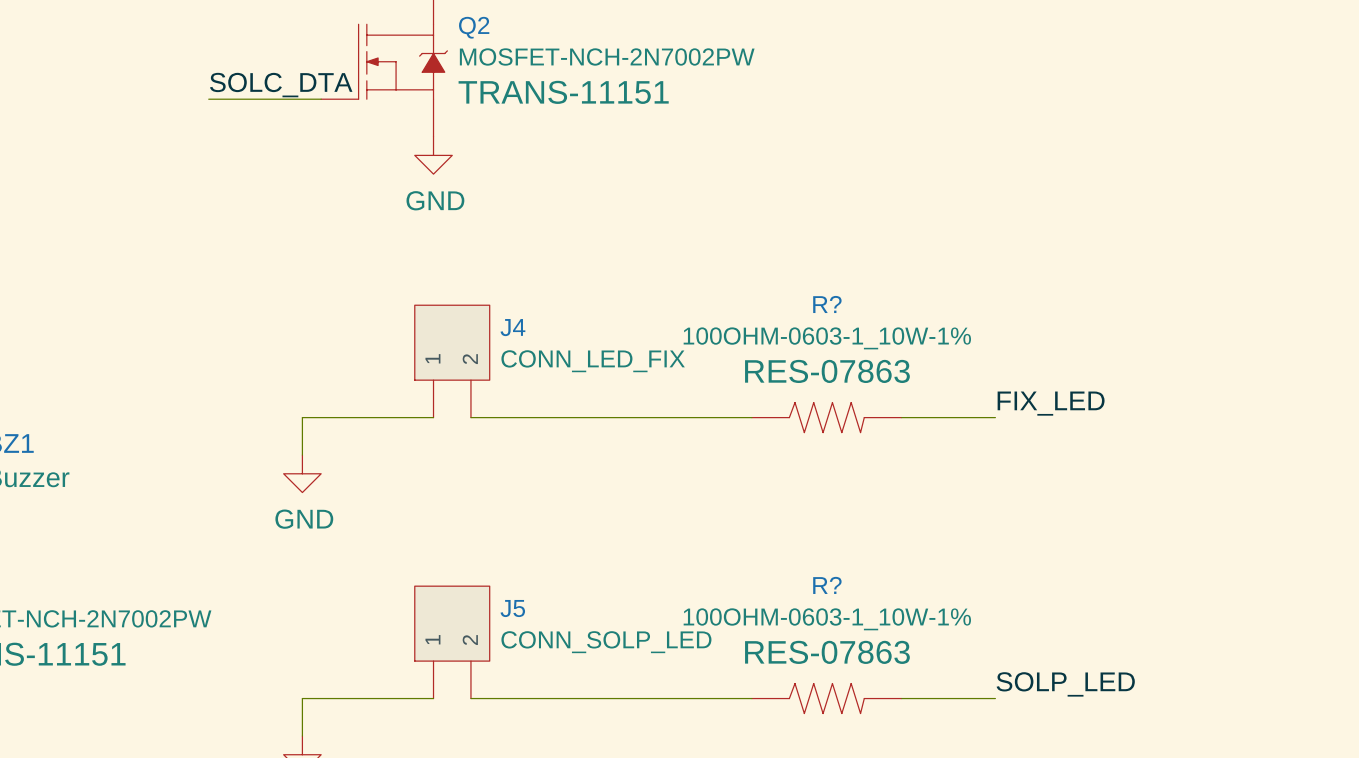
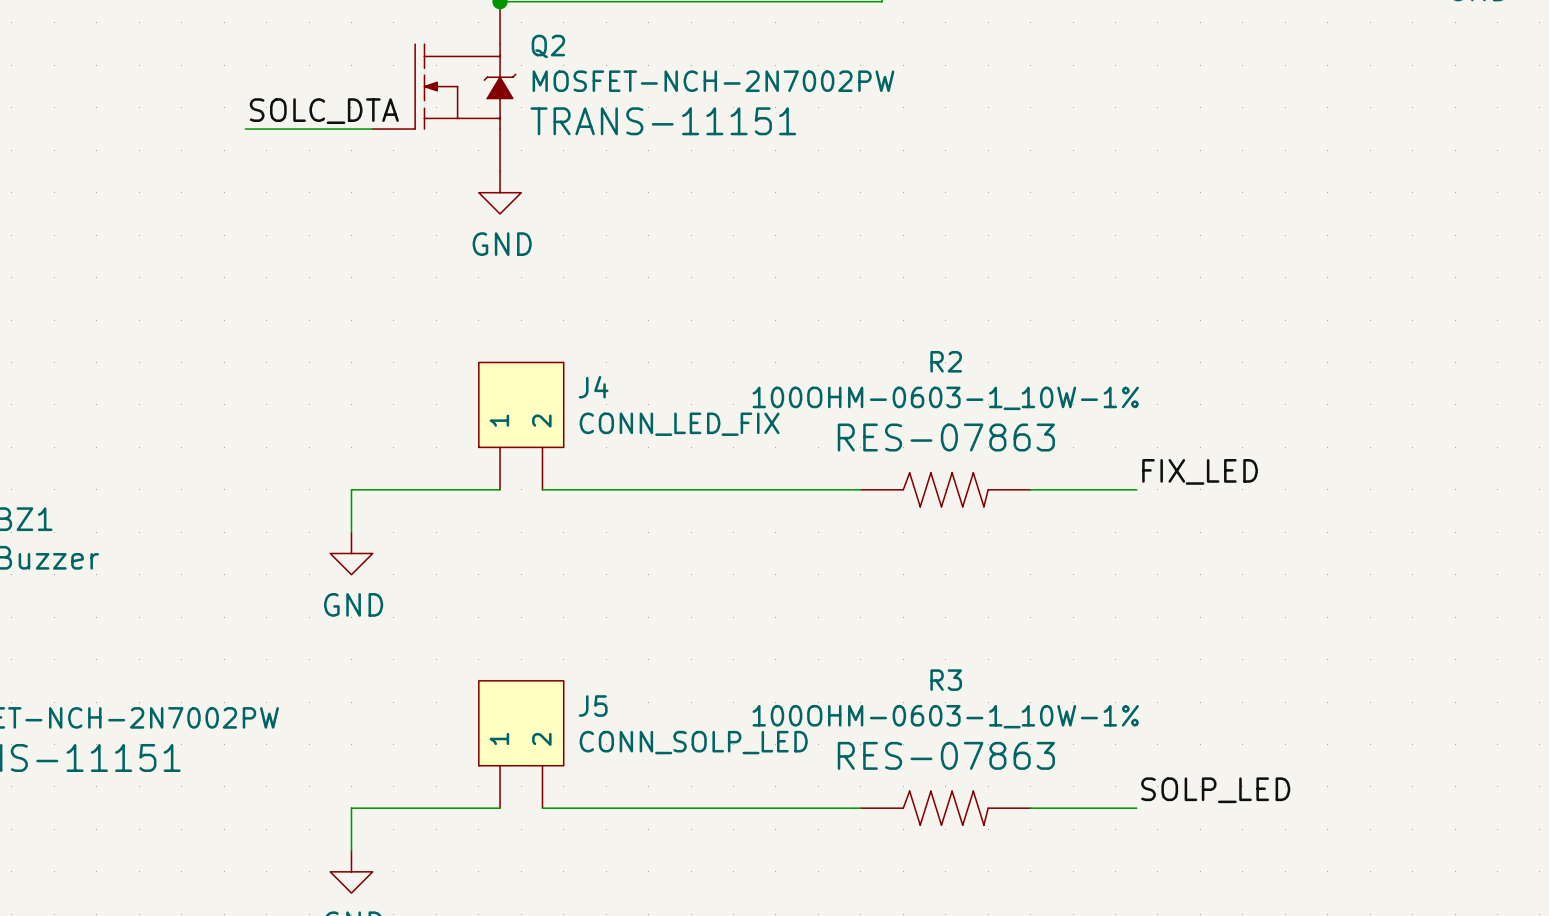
R? name: R? (827, 304) -> R2 (946, 361)
R? name: R? (827, 585) -> R3 (946, 680)

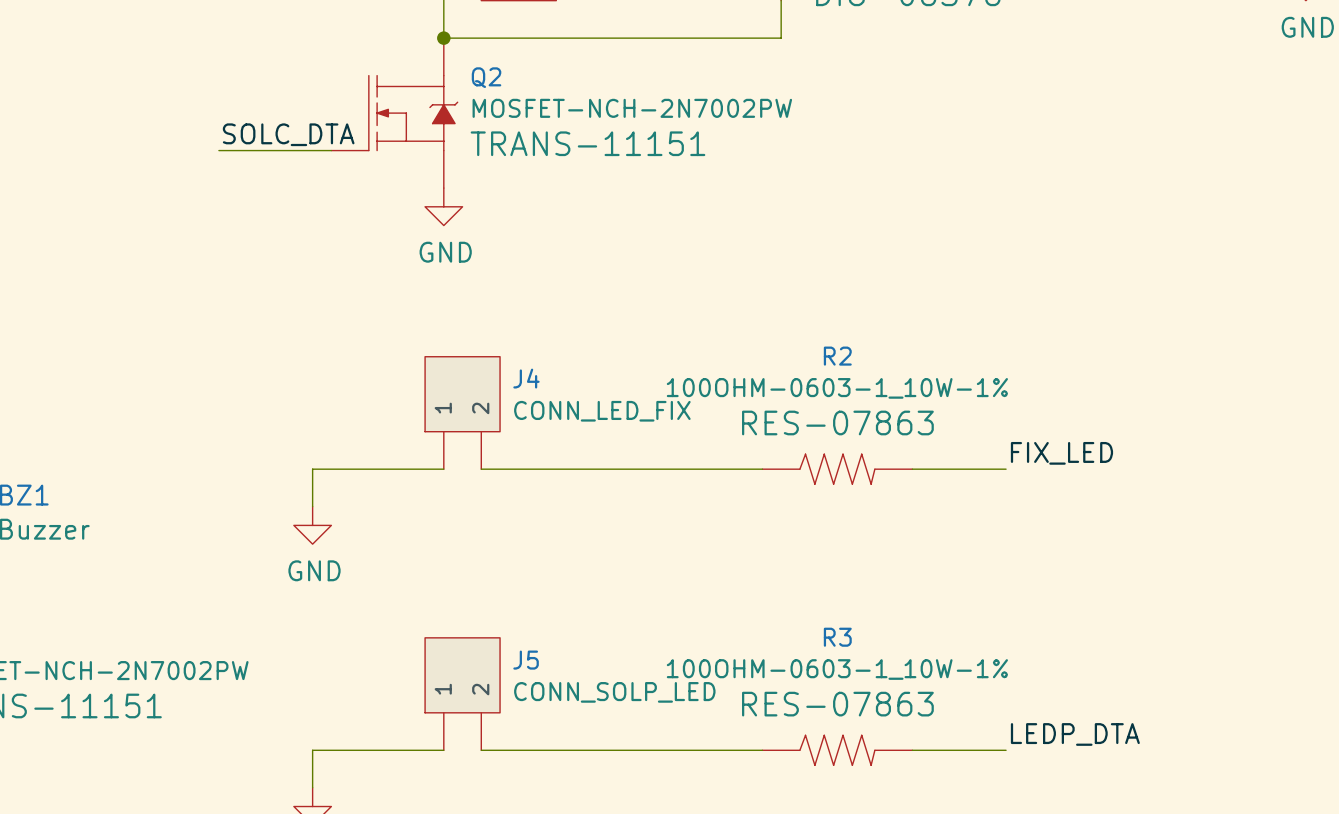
label: SOLP_LED (1215, 790) -> LEDP_DTA (1075, 734)

